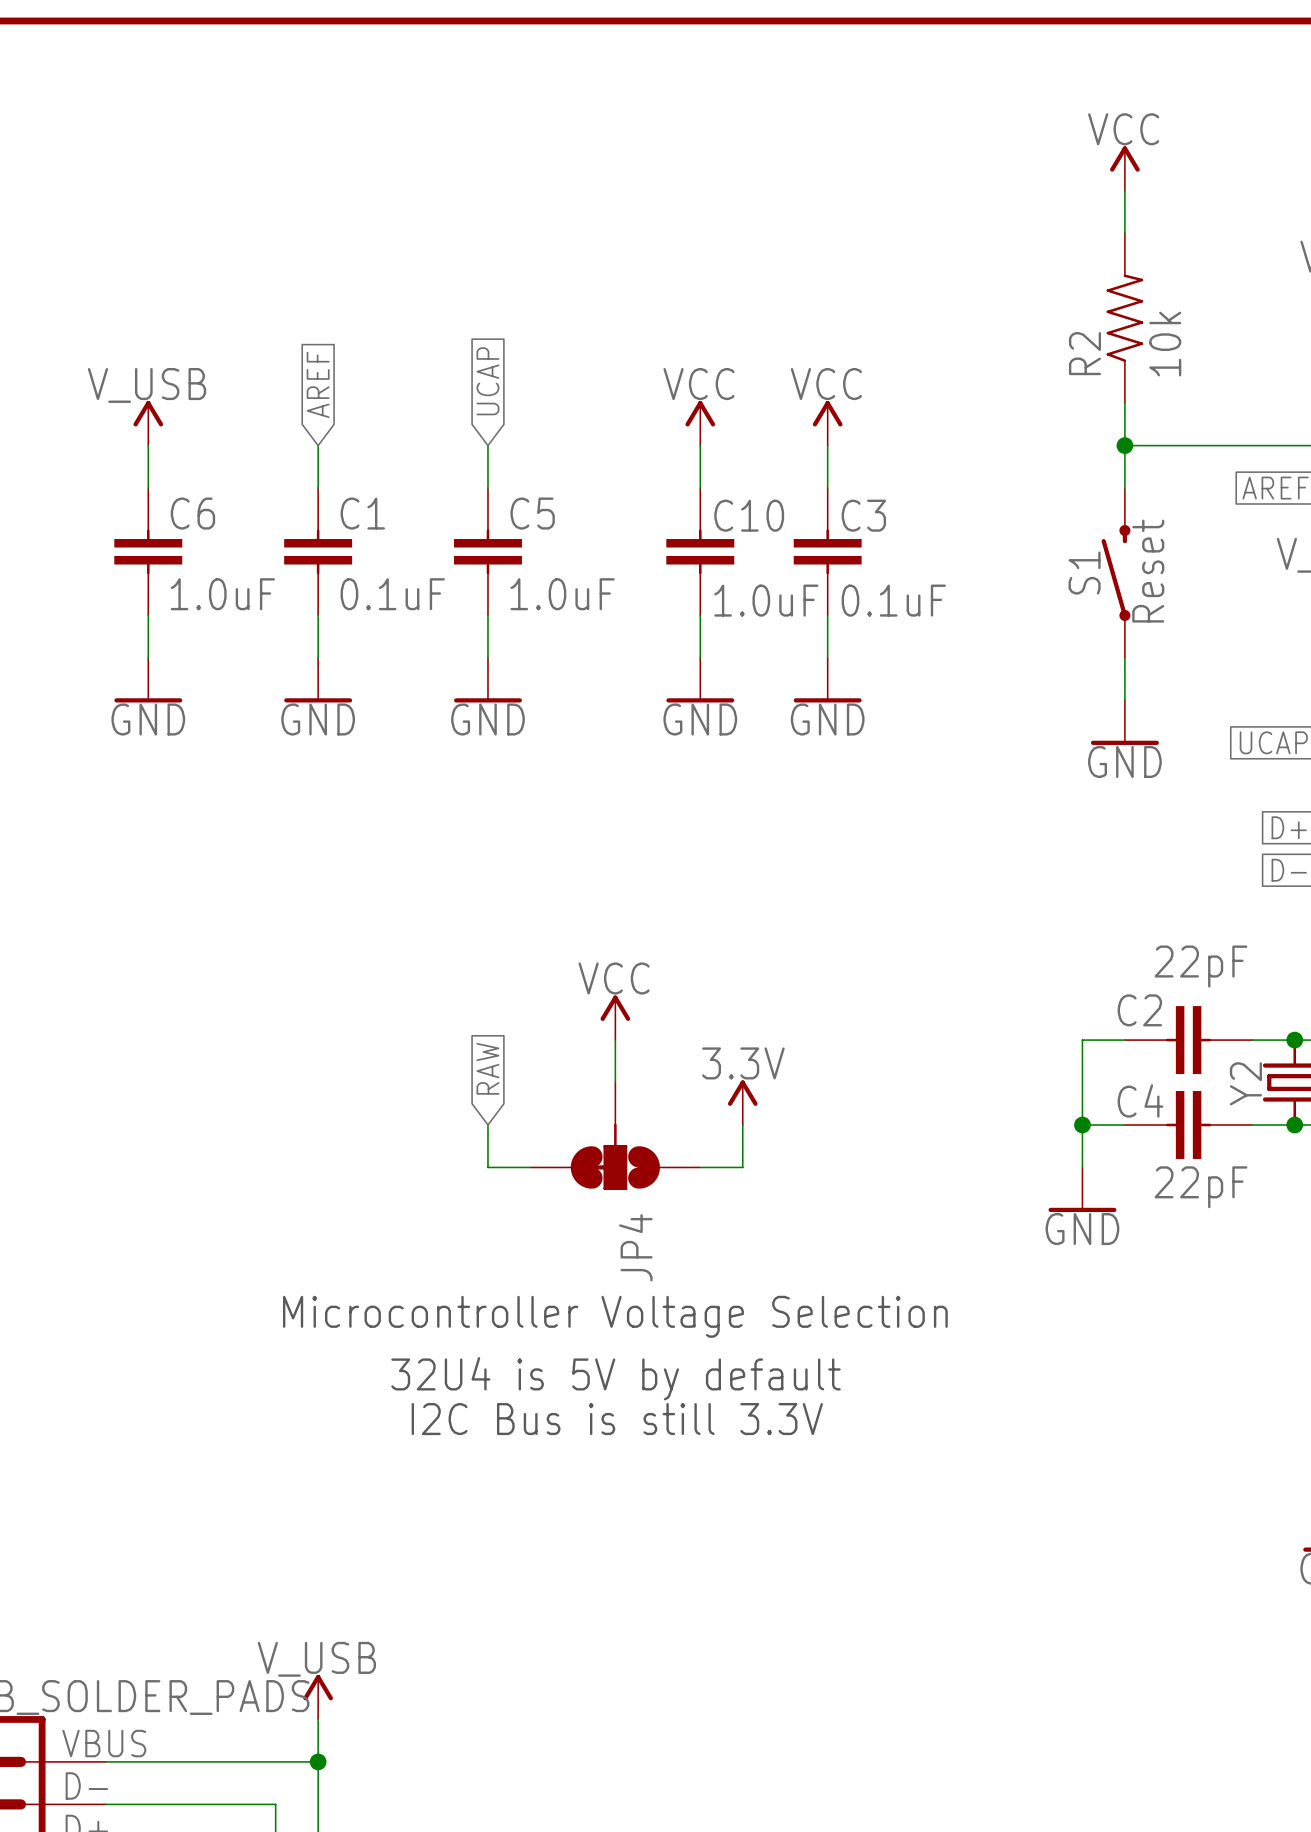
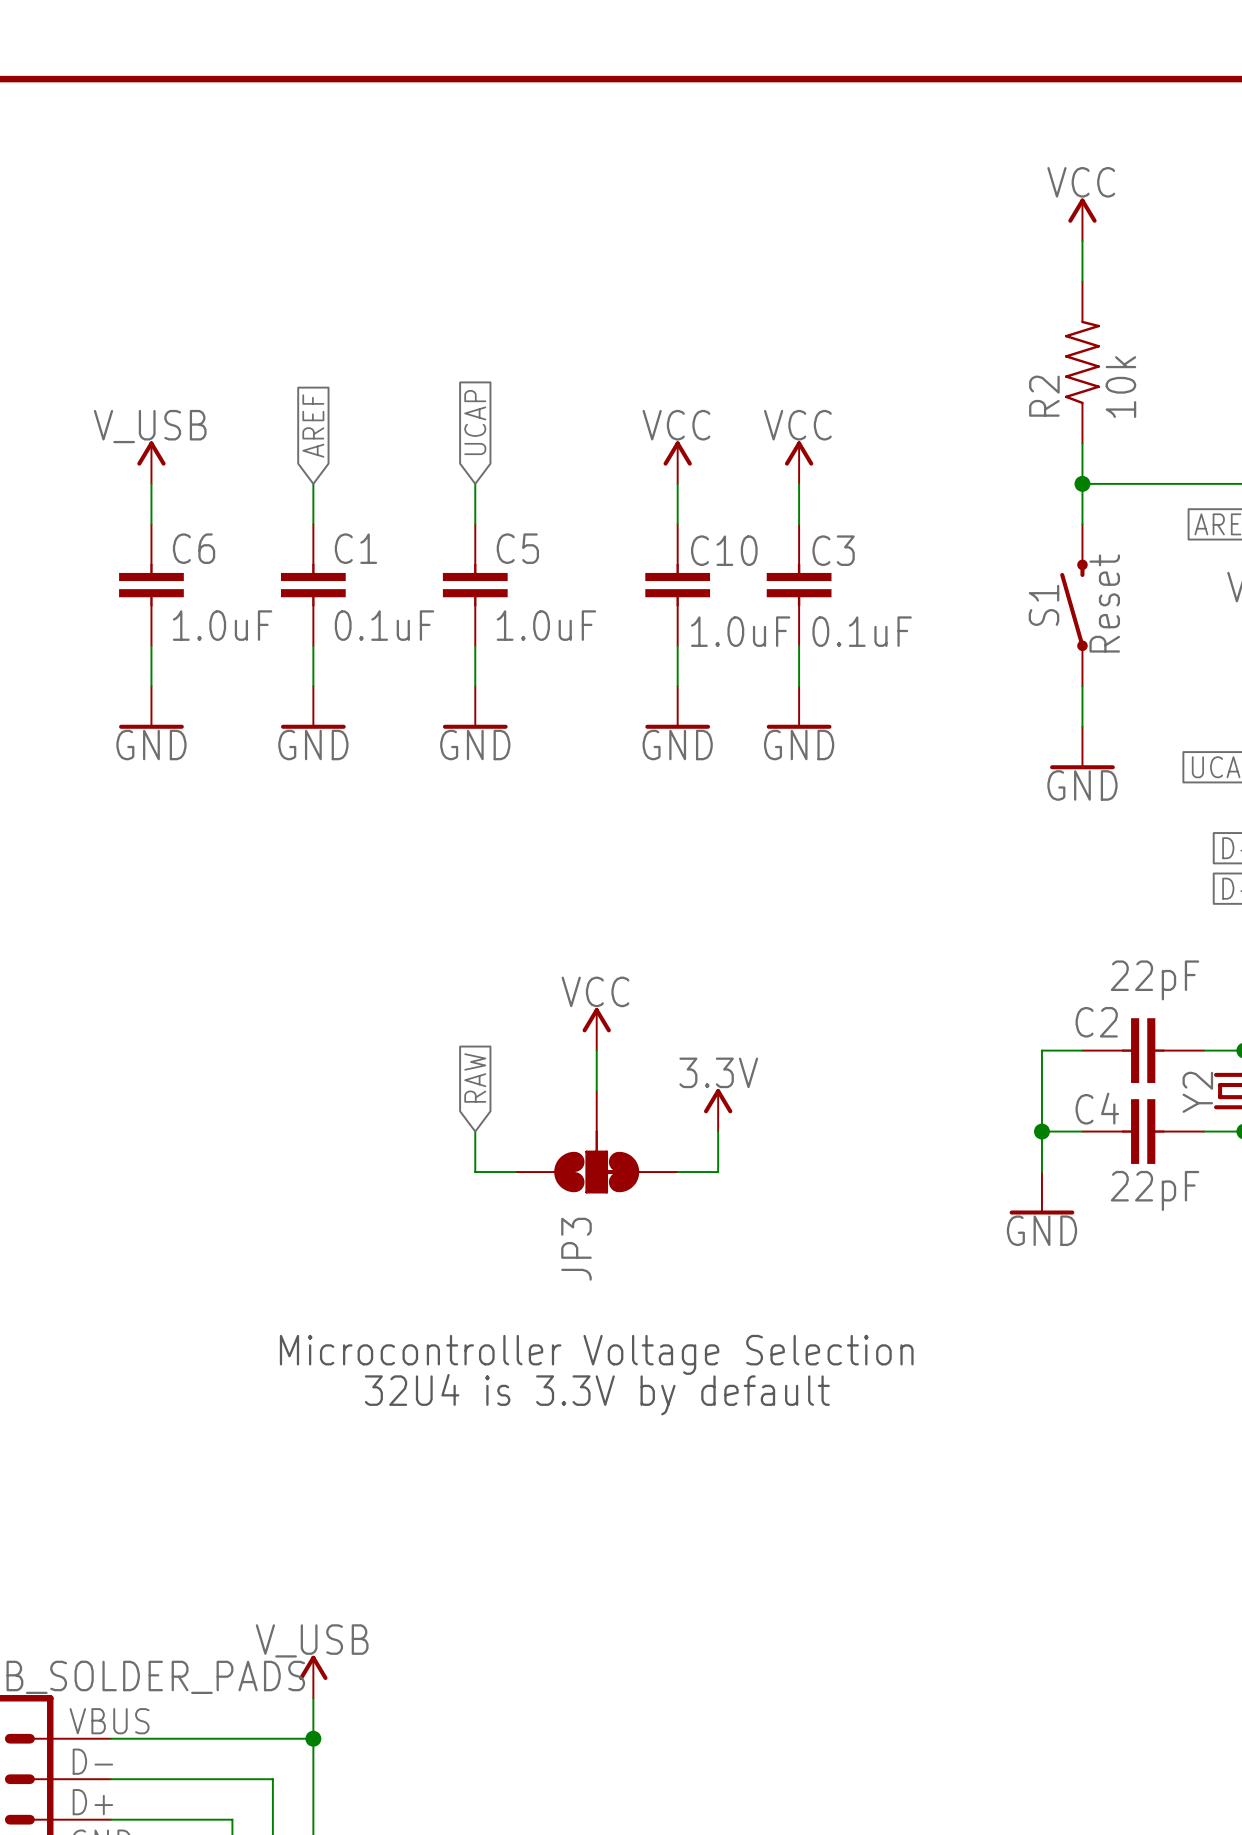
JP4: (615, 1136) -> none
JP3: none -> (596, 1142)
text position: Microcontroller Voltage Selection (615, 1316) -> Microcontroller Voltage Selection (596, 1354)
text: 32U4 is 5V by default (616, 1378) -> 32U4 is 3.3V by default (597, 1394)
text: I2C Bus is still 3.3V (617, 1419) -> none

